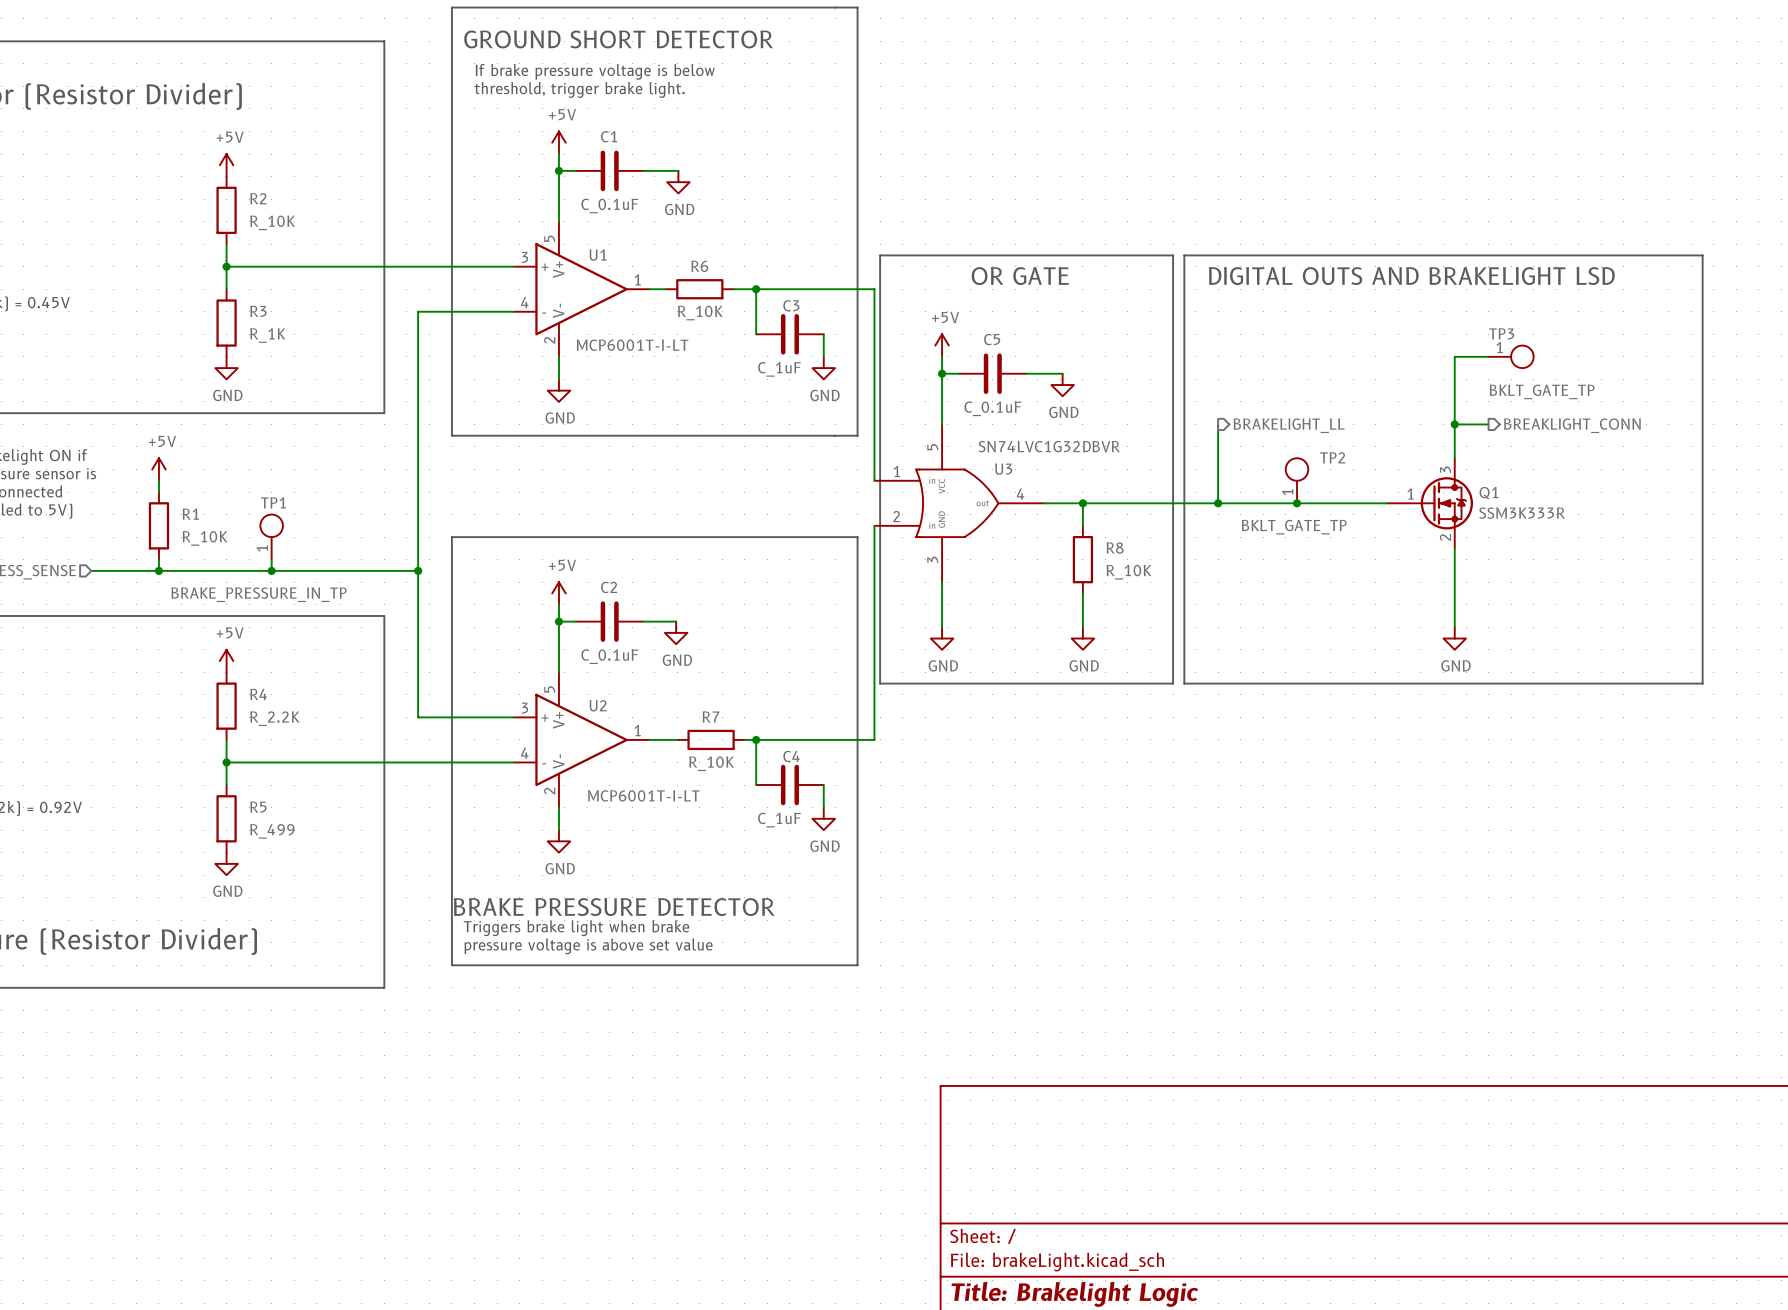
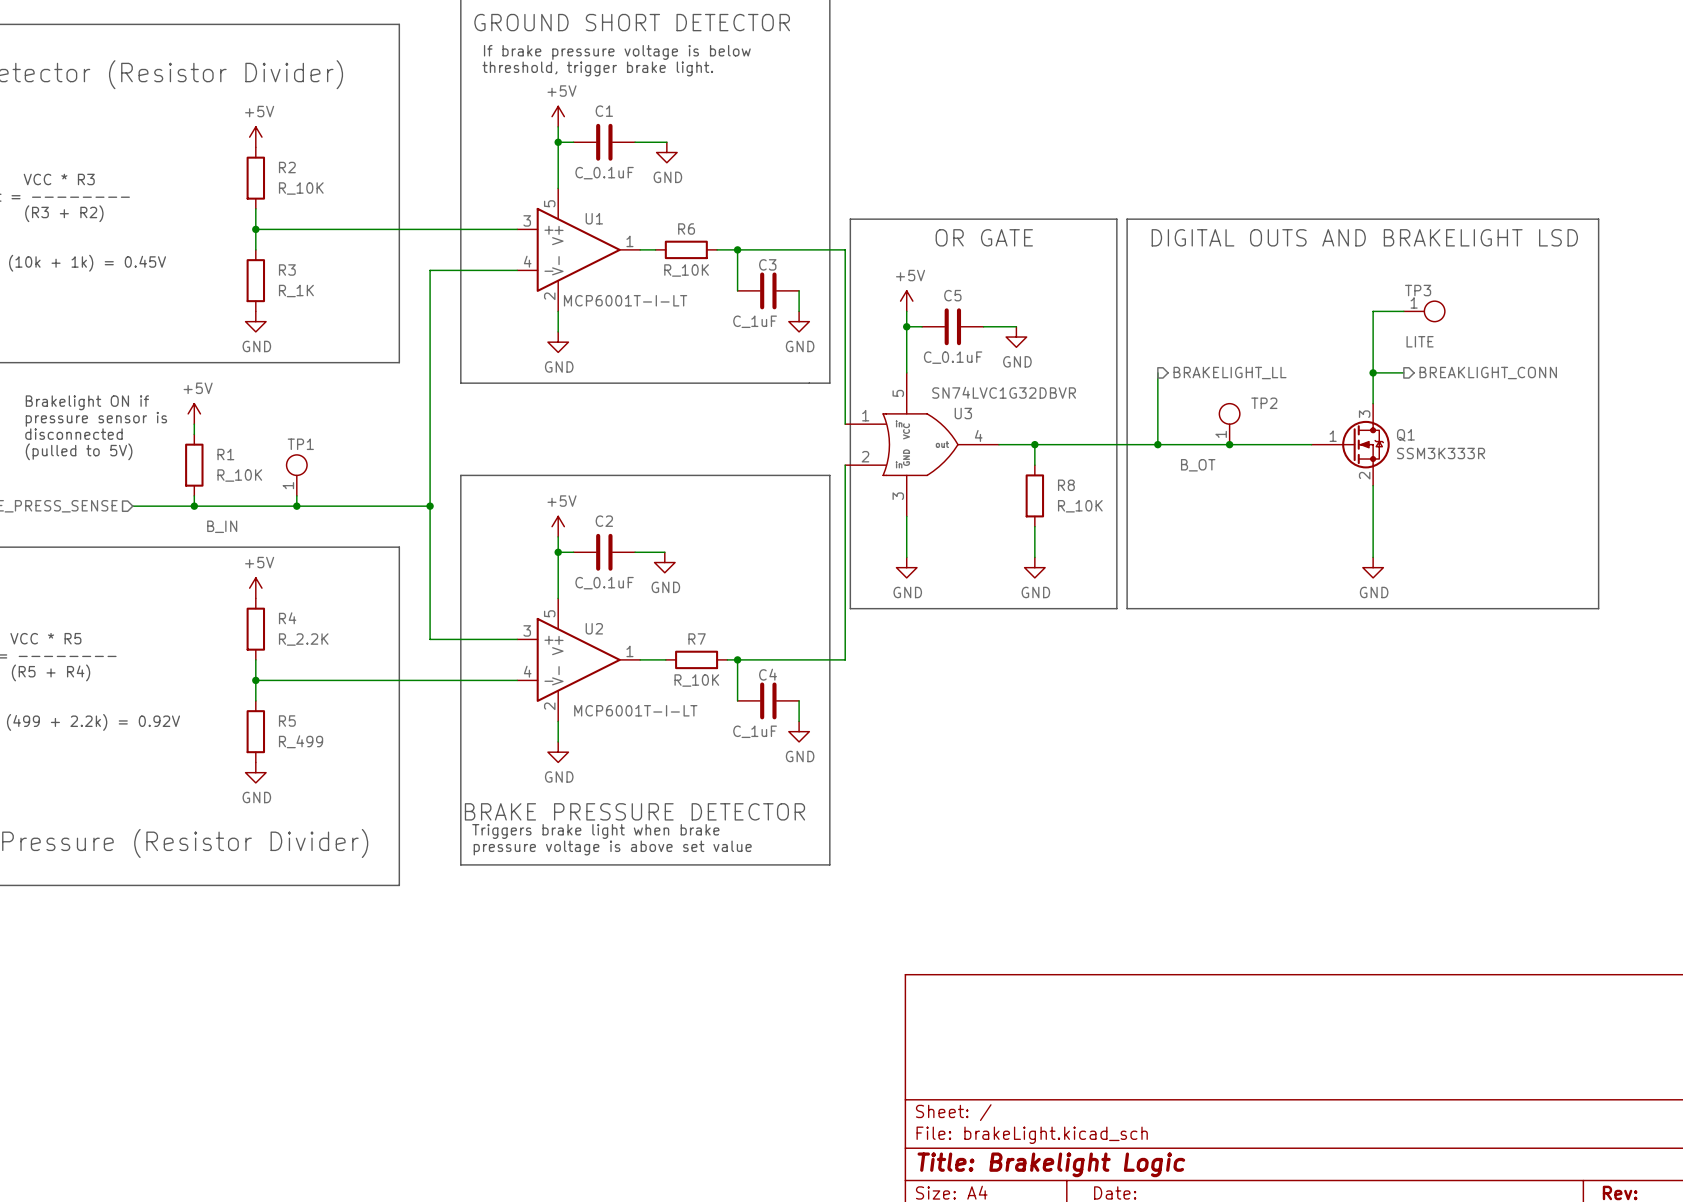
TP3 value: BKLT_GATE_TP (1542, 391) -> LITE (1420, 341)
TP2 value: BKLT_GATE_TP (1294, 527) -> B_OT (1198, 465)
TP1 value: BRAKE_PRESSURE_IN_TP (259, 594) -> B_IN (222, 526)

